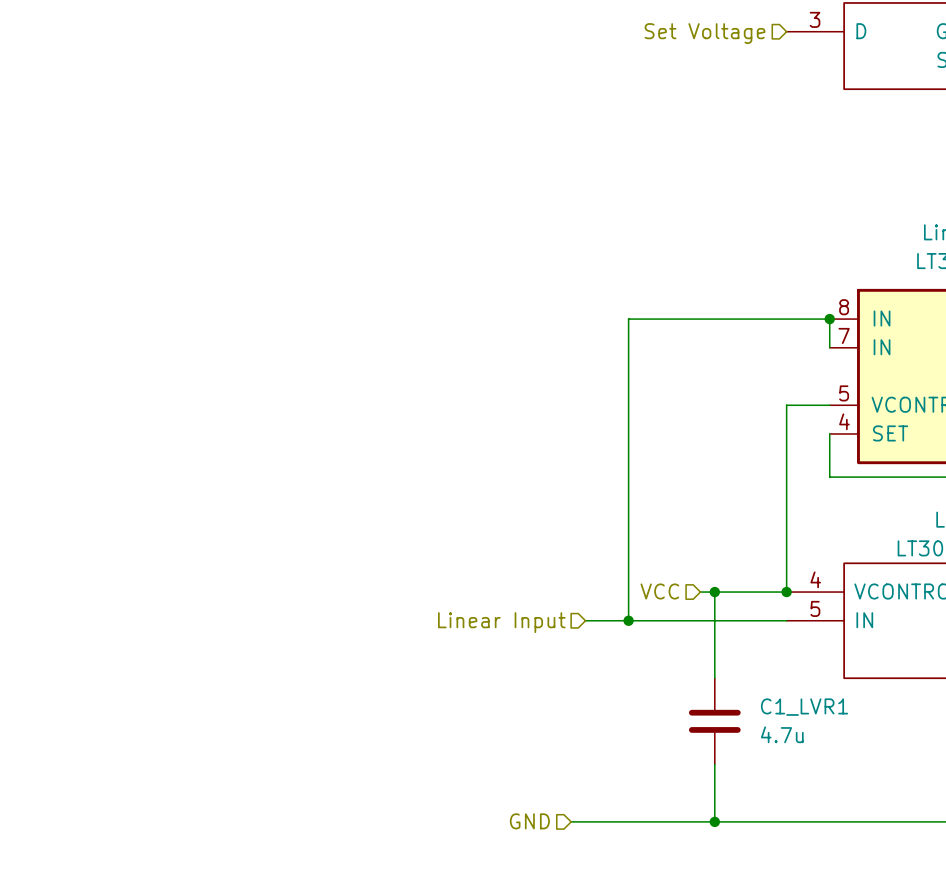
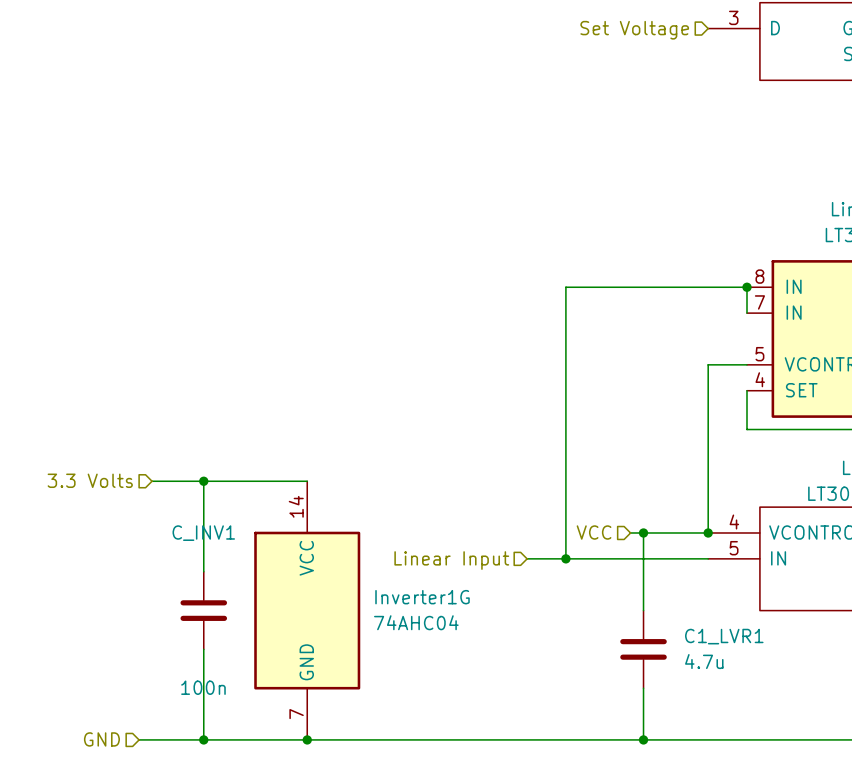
hierarchical label: none -> 3.3 Volts (90, 480)
wire: none -> (152, 481) (307, 481)
wire: none -> (203, 481) (203, 571)
junction: none -> (203, 481)
C_INV1: none -> 100n (203, 610)
Inverter1G: none -> 74AHC04 (307, 610)
wire: none -> (203, 649) (203, 739)
hierarchical label: none -> GND (101, 739)
wire: none -> (139, 739) (514, 739)
junction: none -> (203, 739)
junction: none -> (307, 739)
hierarchical label: GND (529, 821) -> none

